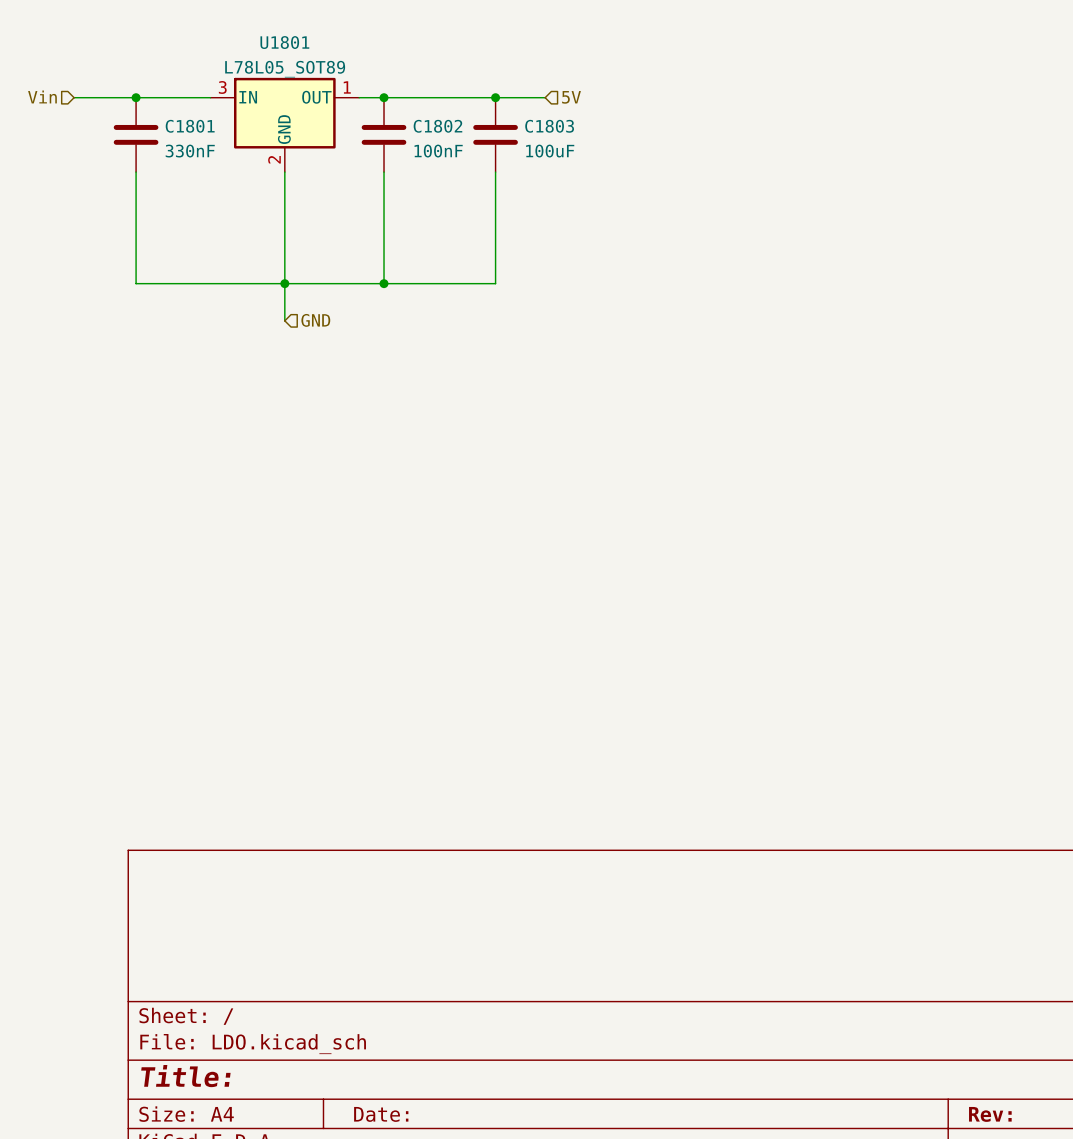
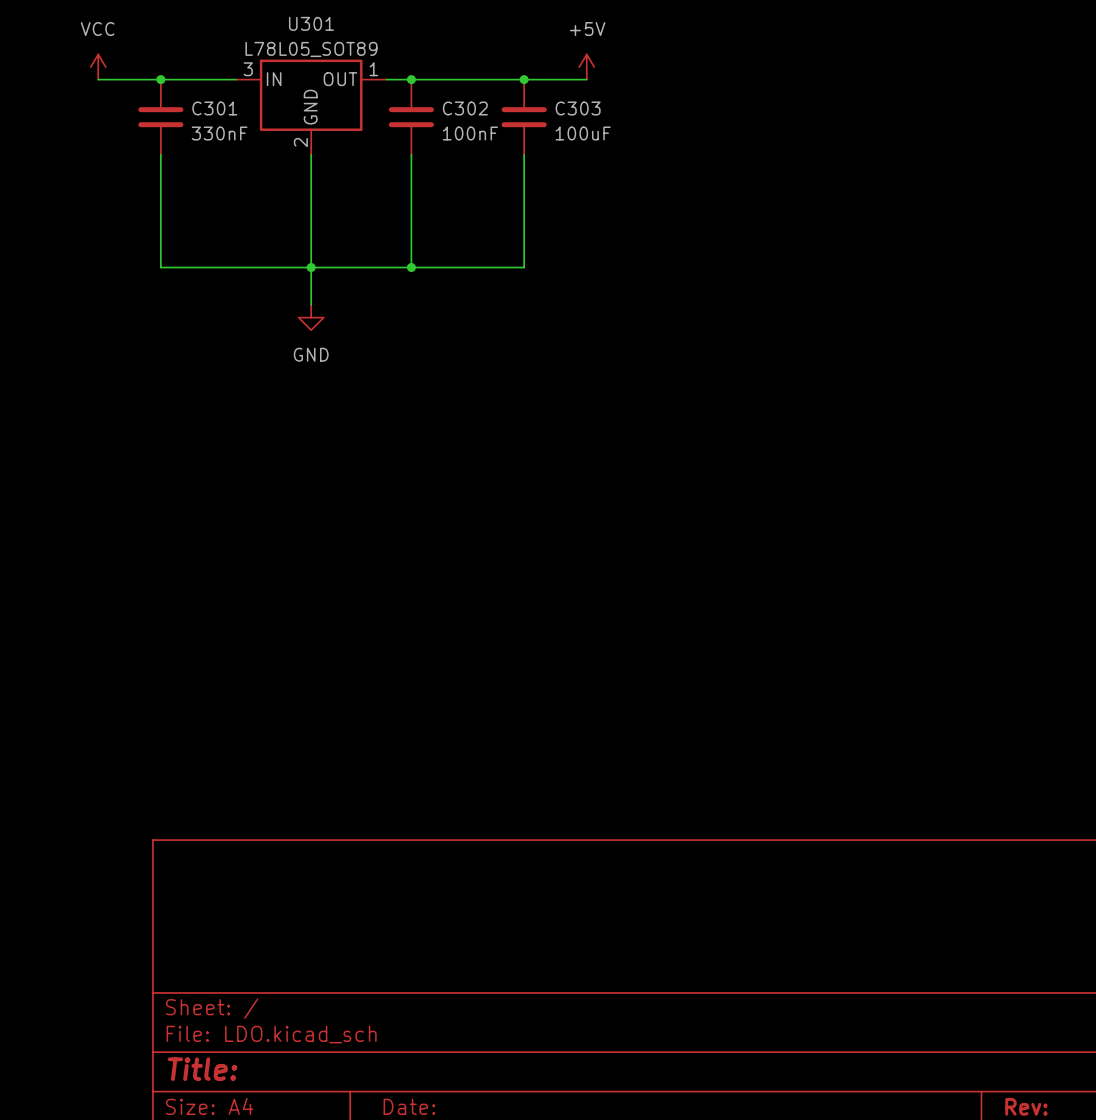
U1801 name: U1801 (284, 42) -> U301 (311, 23)
power symbol: none -> VCC (98, 67)
power symbol: none -> +5V (586, 67)
hierarchical label: Vin (42, 96) -> none
wire: none -> (574, 79) (586, 79)
hierarchical label: 5V (571, 97) -> none
C1801 name: C1801 (190, 126) -> C301 (214, 108)
C1802 name: C1802 (437, 126) -> C302 (465, 108)
C1803 name: C1803 (549, 126) -> C303 (578, 108)
hierarchical label: GND (315, 320) -> none
power symbol: none -> GND (311, 317)

